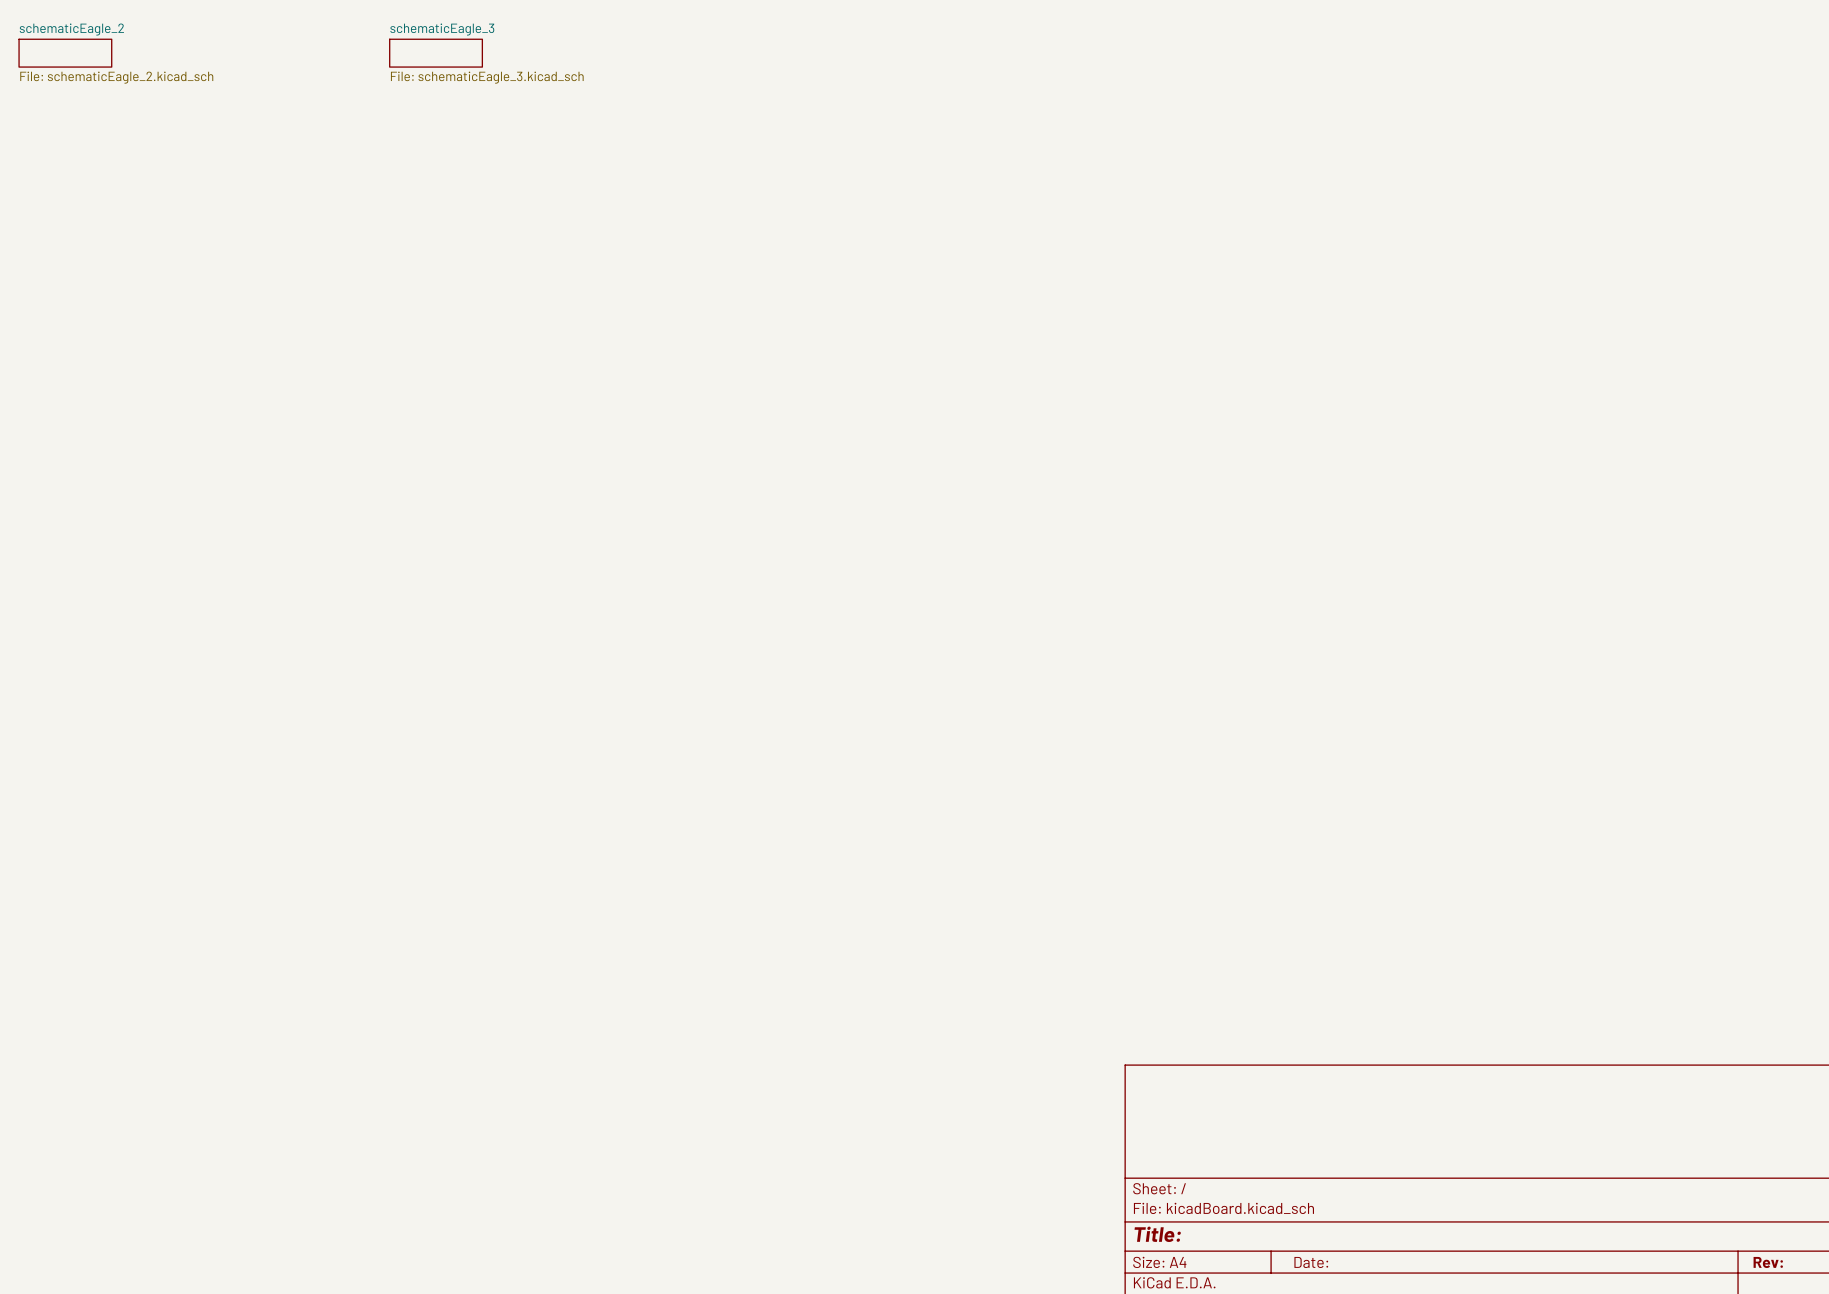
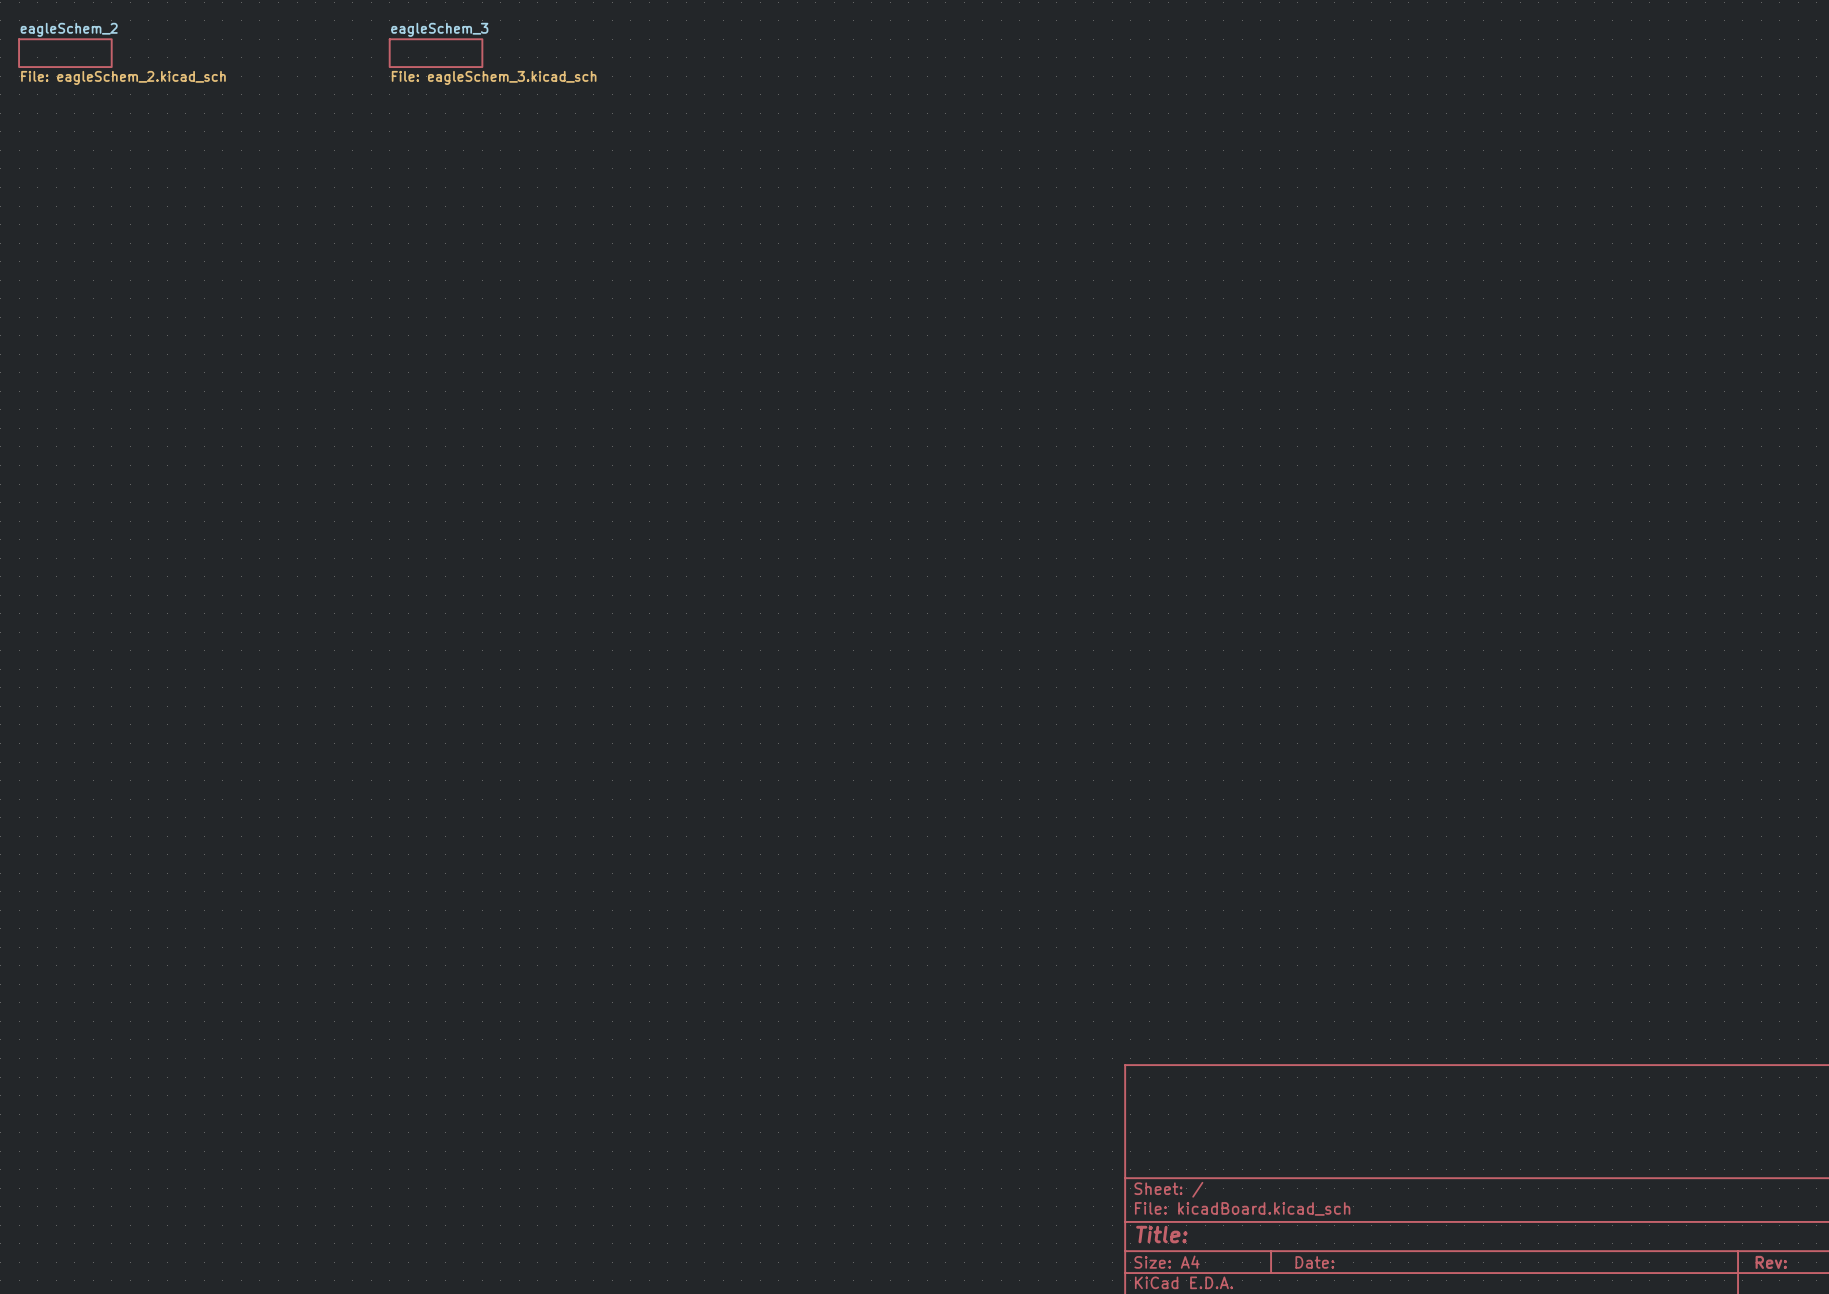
sheet schematicEagle_2 name: schematicEagle_2 (71, 29) -> eagleSchem_2 (69, 29)
sheet schematicEagle_3 name: schematicEagle_3 (442, 29) -> eagleSchem_3 (439, 29)
sheet schematicEagle_2 value: File: schematicEagle_2.kicad_sch (116, 77) -> File: eagleSchem_2.kicad_sch (123, 77)
sheet schematicEagle_3 value: File: schematicEagle_3.kicad_sch (487, 77) -> File: eagleSchem_3.kicad_sch (494, 77)

